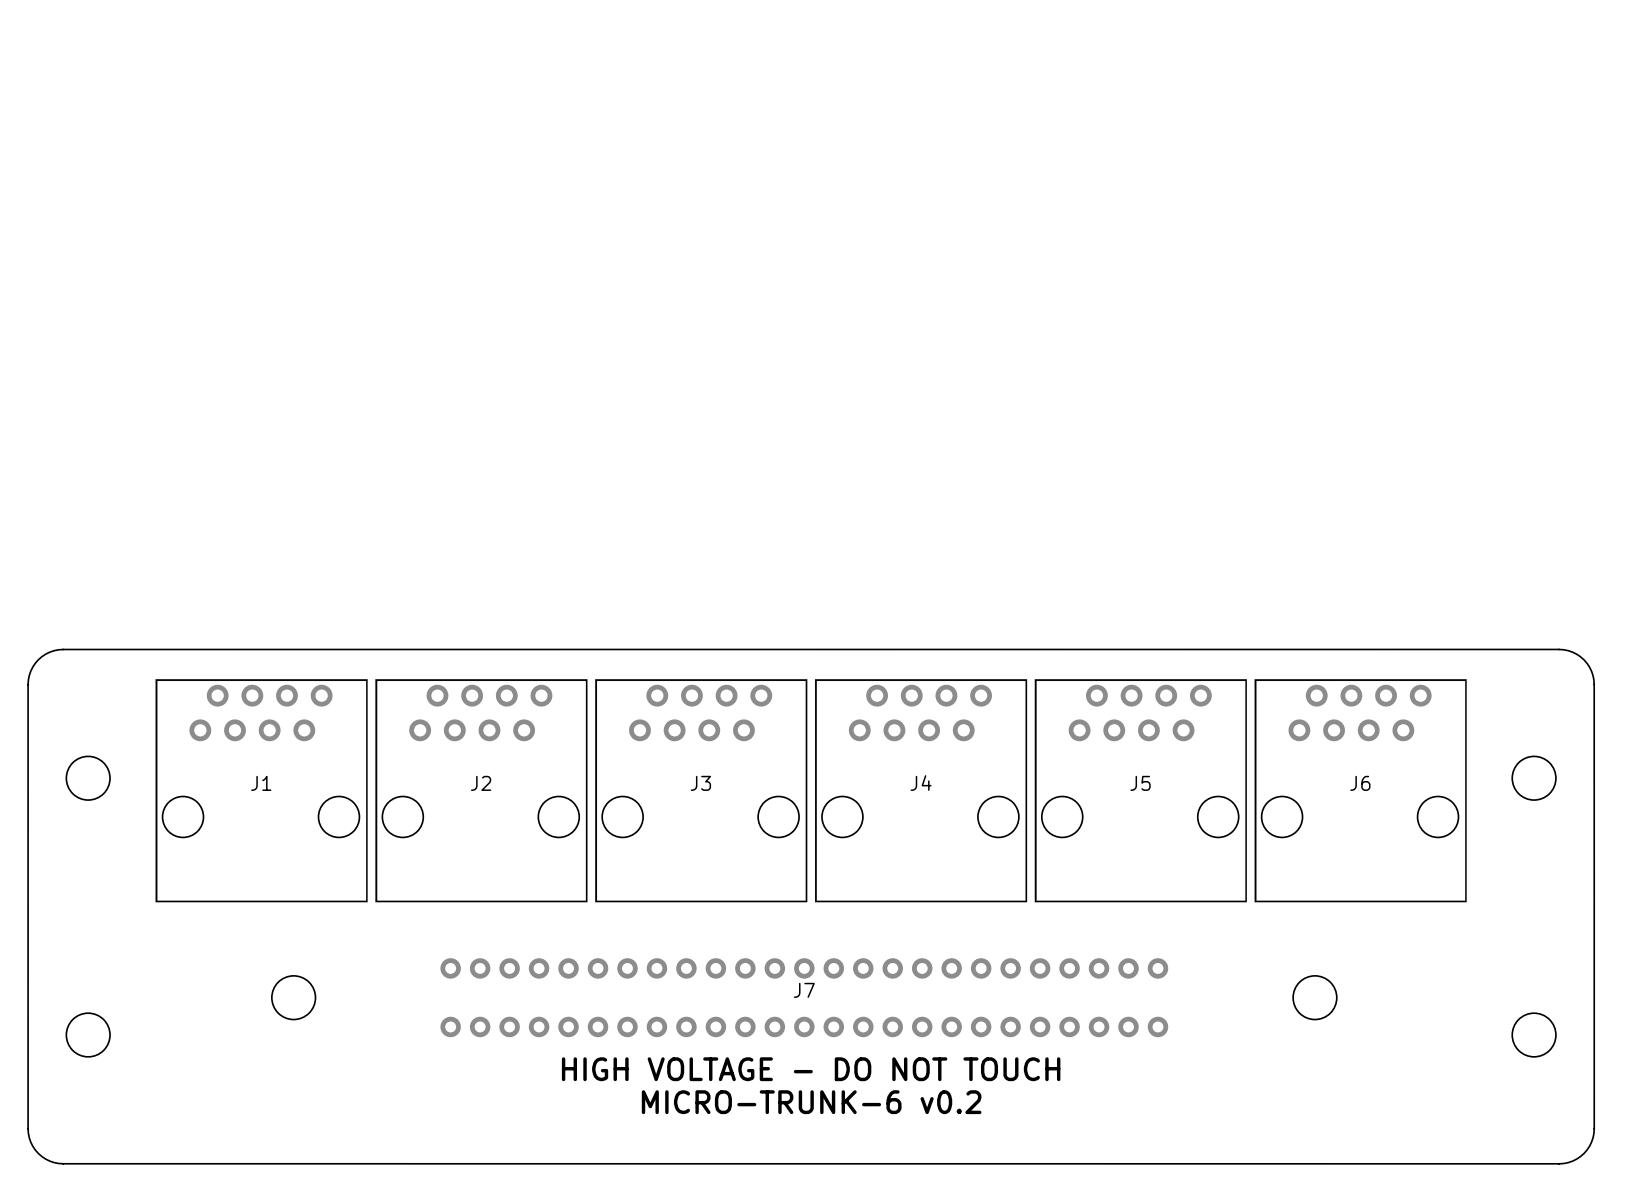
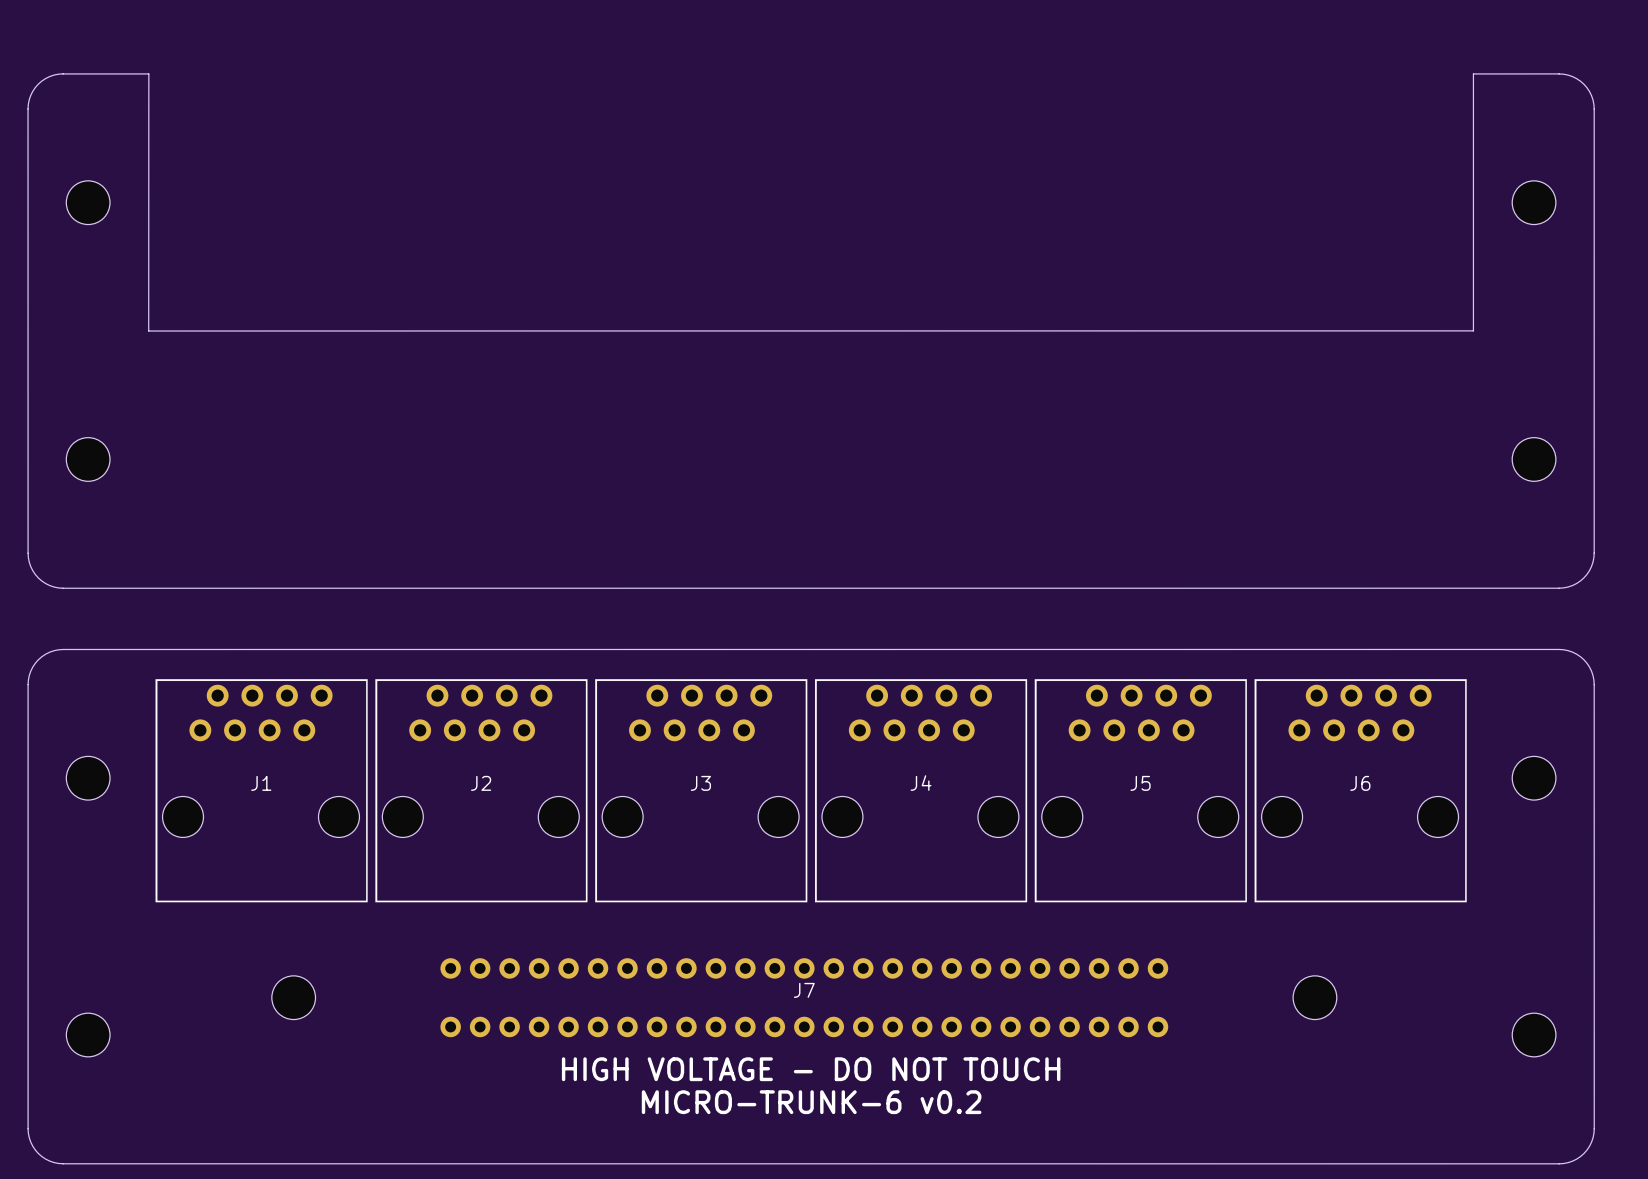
board edge: none -> (63, 73) (49, 76) (38, 84) (30, 95) (28, 109) (28, 553) (30, 566) (35, 574) (41, 581) (54, 587) (1559, 588) (1572, 585) (1580, 580) (1589, 570) (1592, 562) (1594, 108) (1592, 99) (1586, 87) (1576, 78) (1568, 75) (1473, 73) (1473, 330) (148, 331) (148, 73) (63, 73)
part: none -> (88, 202)
part: none -> (1534, 202)
part: none -> (88, 459)
part: none -> (1534, 459)

